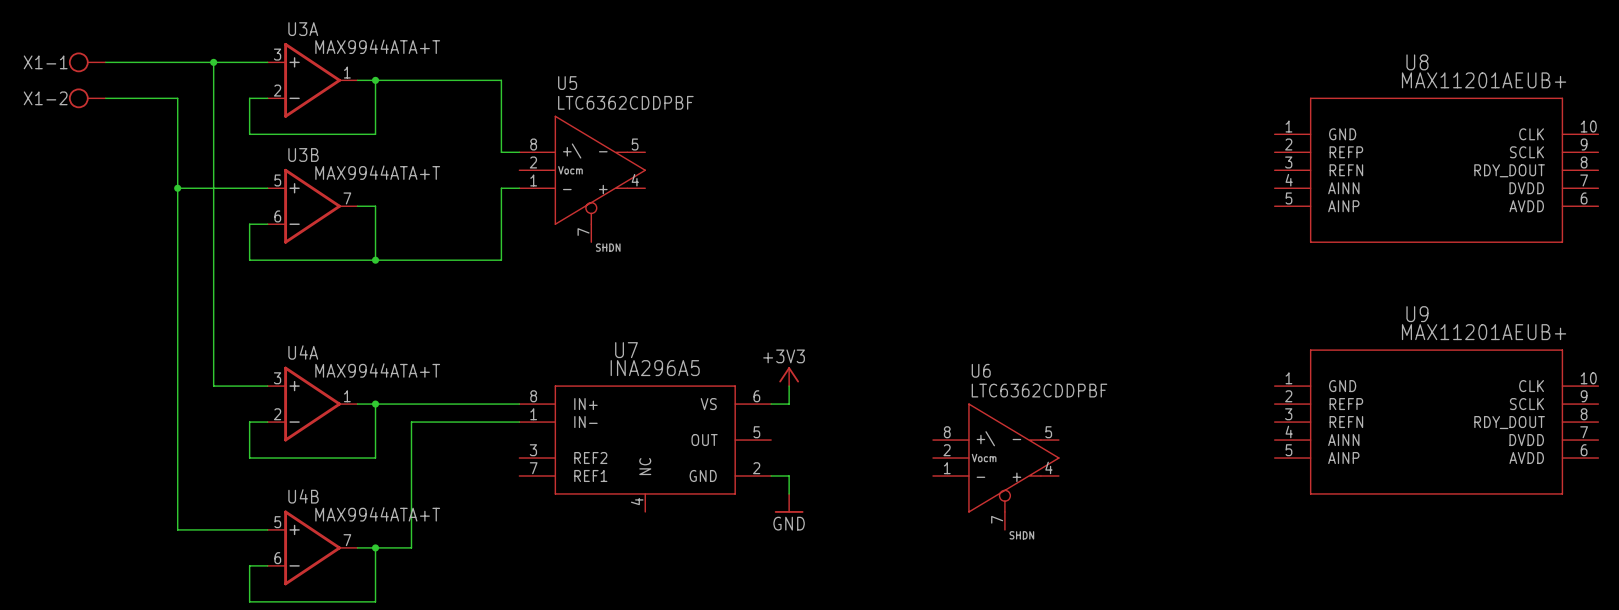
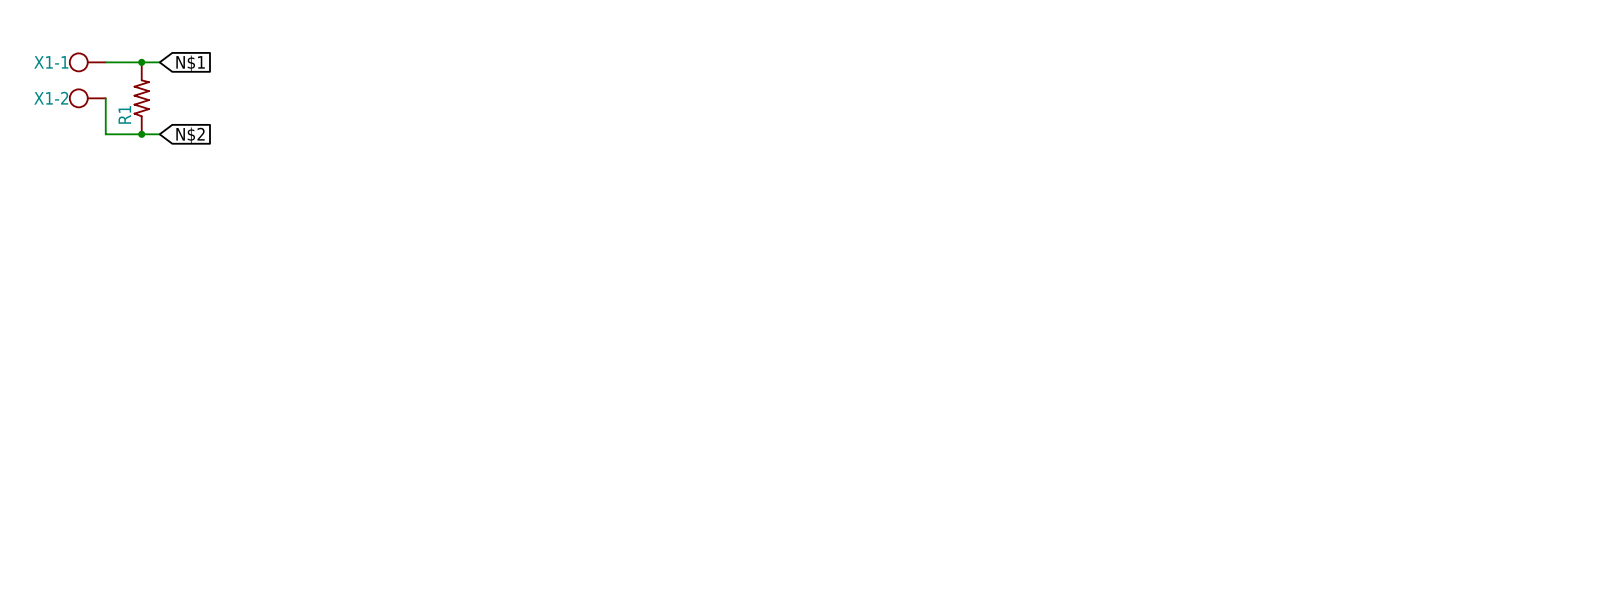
junction: none -> (141, 62)
wire: (159, 62) (267, 62) -> none
global label: none -> N$1 (190, 63)
wire: (213, 62) (213, 386) (267, 386) -> none
junction: (213, 62) -> none
U3A: MAX9944ATA+T (312, 80) -> none
wire: (357, 80) (501, 80) (501, 152) (519, 152) -> none
wire: (375, 80) (375, 134) (249, 134) (249, 98) (267, 98) -> none
junction: (375, 80) -> none
wire: (105, 98) (177, 98) (177, 529) (267, 529) -> (105, 98) (105, 134) (159, 134)
R1: none -> (141, 98)
junction: none -> (141, 134)
global label: none -> N$2 (190, 135)
U8: MAX11201AEUB+ (1436, 170) -> none
U5: LTC6362CDDPBF (582, 178) -> none
wire: (177, 188) (267, 188) -> none
junction: (177, 188) -> none
wire: (519, 188) (501, 188) (501, 260) (249, 260) (249, 224) (267, 224) -> none
U3B: MAX9944ATA+T (312, 206) -> none
wire: (357, 206) (375, 206) (375, 260) -> none
junction: (375, 260) -> none
power symbol: +3V3 (789, 376) -> none
wire: (789, 386) (789, 404) (771, 404) -> none
U4A: MAX9944ATA+T (312, 404) -> none
wire: (357, 404) (519, 404) -> none
wire: (375, 404) (375, 458) (249, 458) (249, 422) (267, 422) -> none
junction: (375, 404) -> none
wire: (519, 422) (411, 422) (411, 547) (357, 547) -> none
U9: MAX11201AEUB+ (1436, 422) -> none
U7: INA296A5 (645, 448) -> none
U6: LTC6362CDDPBF (996, 466) -> none
wire: (771, 475) (789, 475) (789, 493) -> none
power symbol: GND (789, 503) -> none
U4B: MAX9944ATA+T (312, 547) -> none
wire: (375, 547) (375, 601) (249, 601) (249, 565) (267, 565) -> none
junction: (375, 547) -> none

